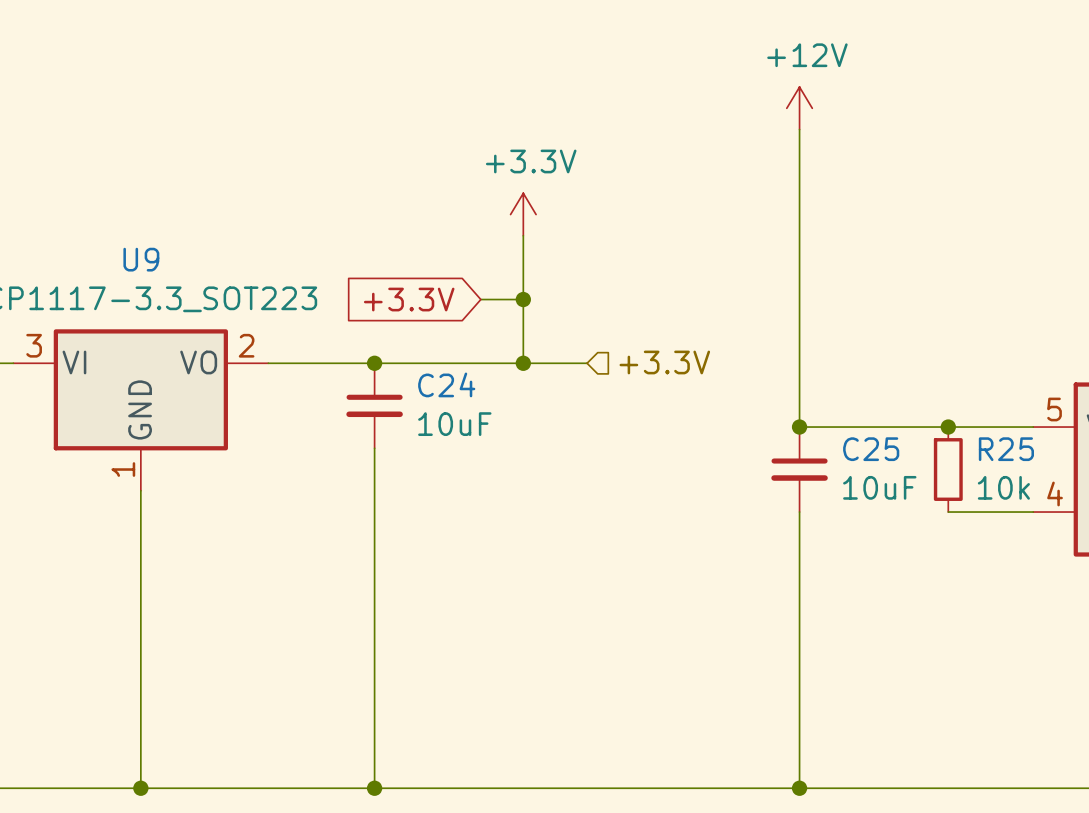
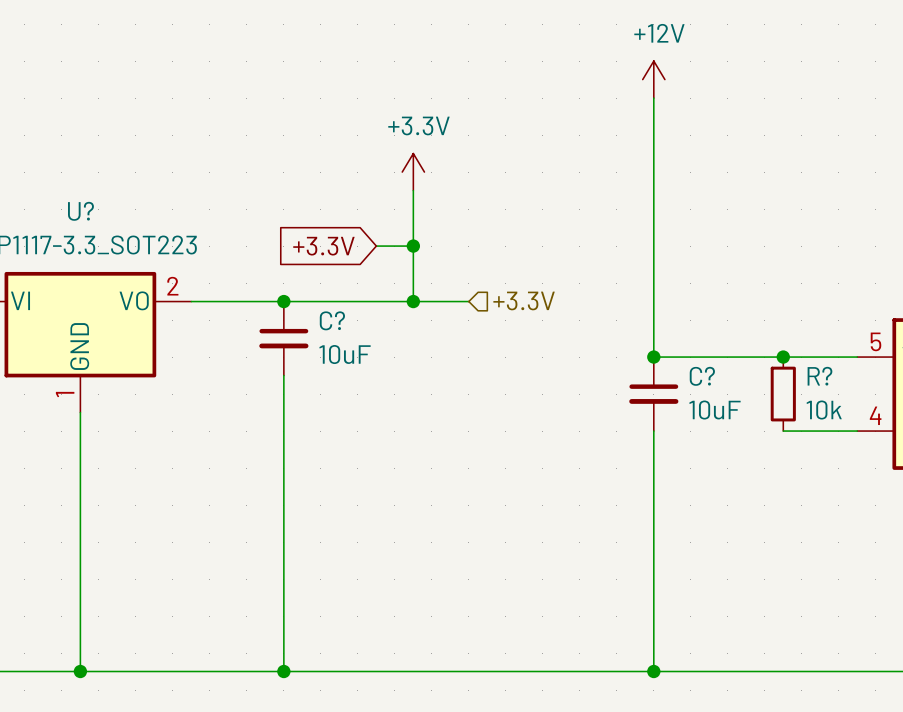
U9 name: U9 (141, 259) -> U? (80, 211)
C24 name: C24 (446, 384) -> C? (332, 320)
C25 name: C25 (871, 449) -> C? (702, 376)
R25 name: R25 (1006, 449) -> R? (819, 376)

